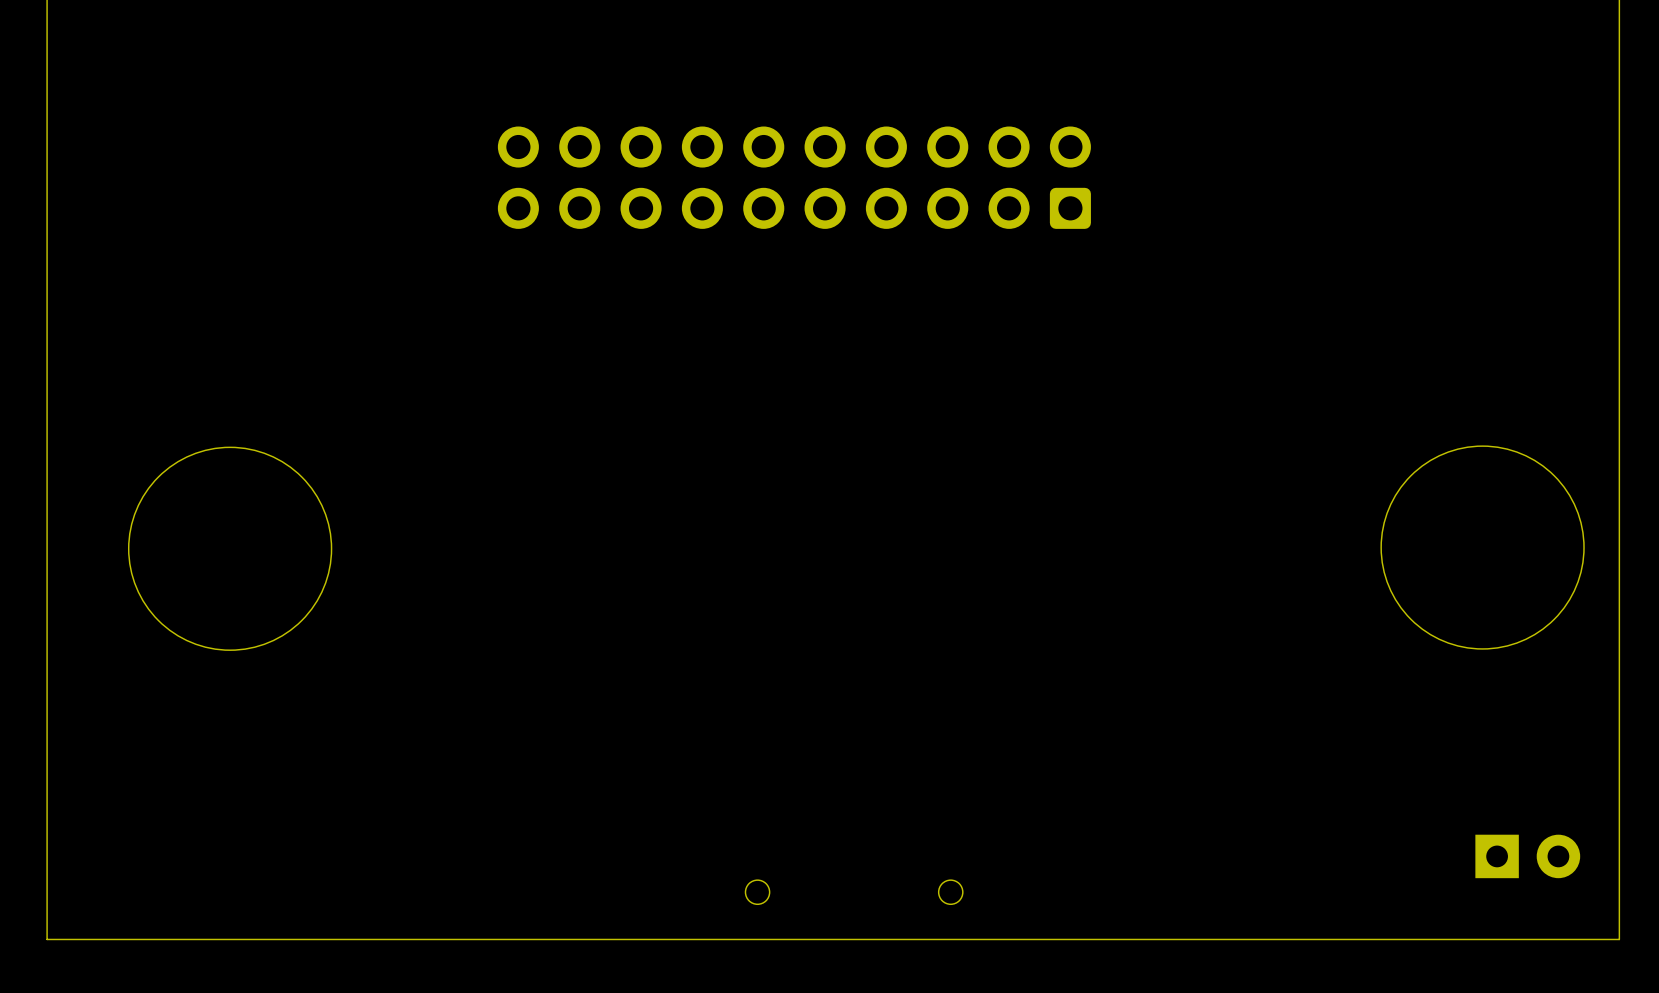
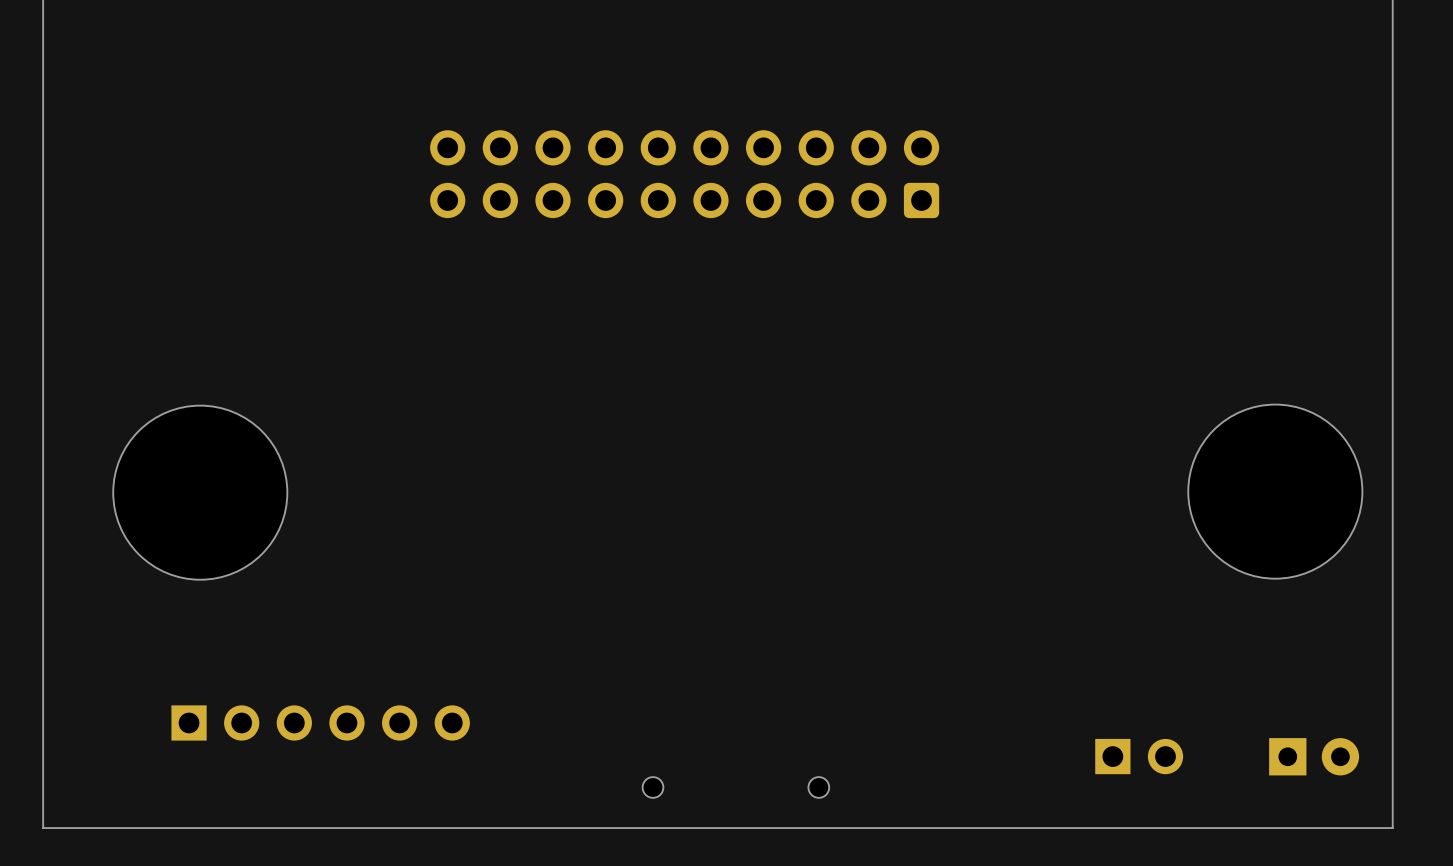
part: none -> (320, 722)
part: none -> (1139, 756)

